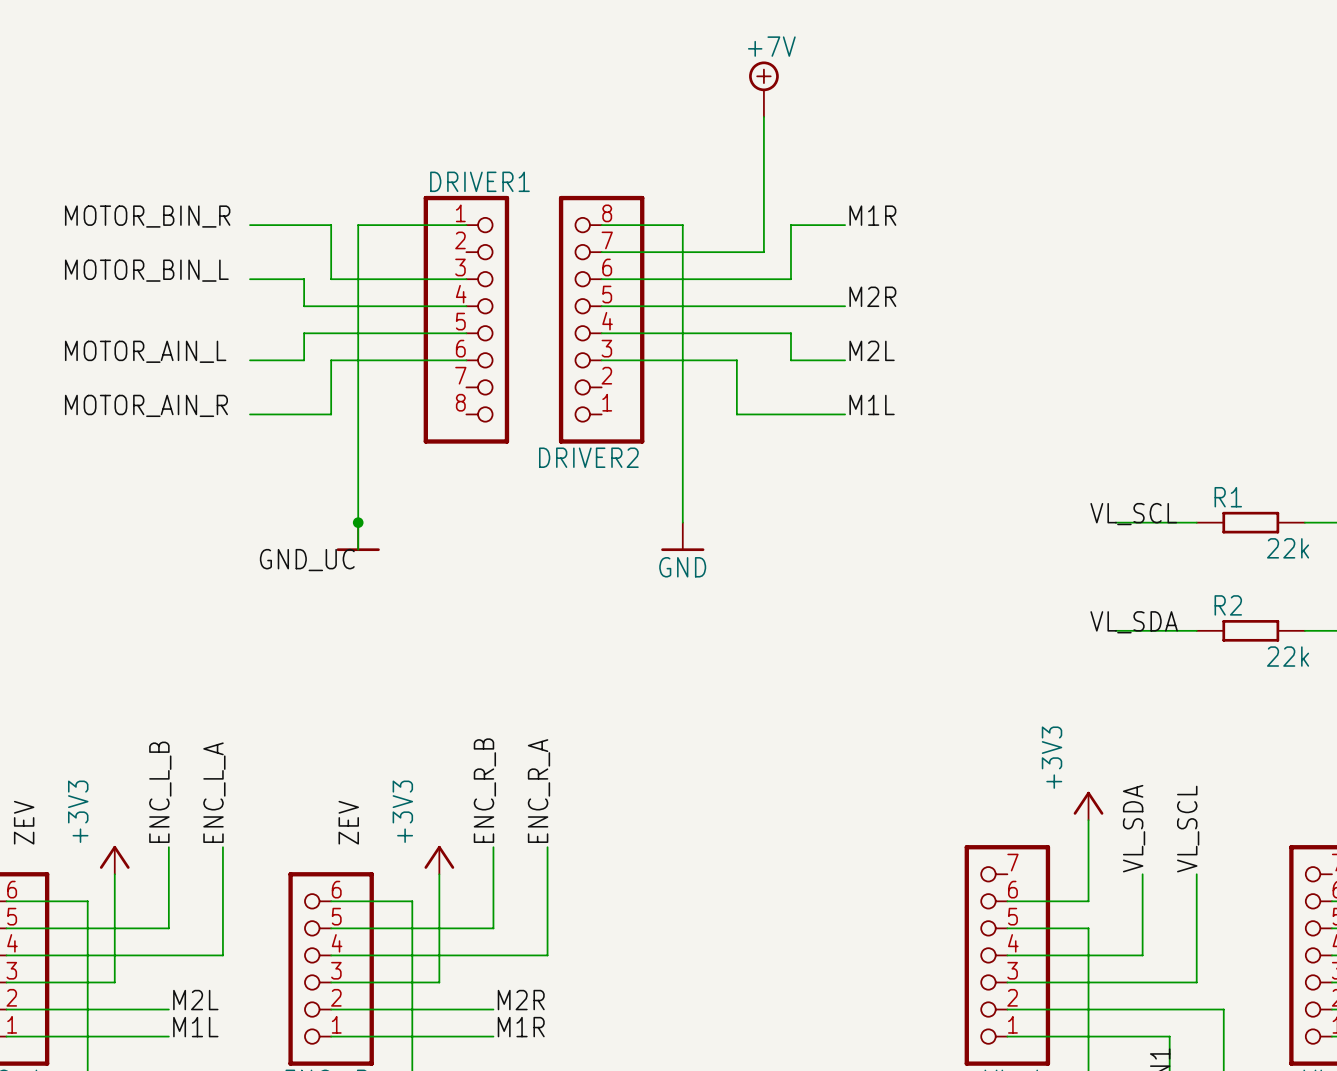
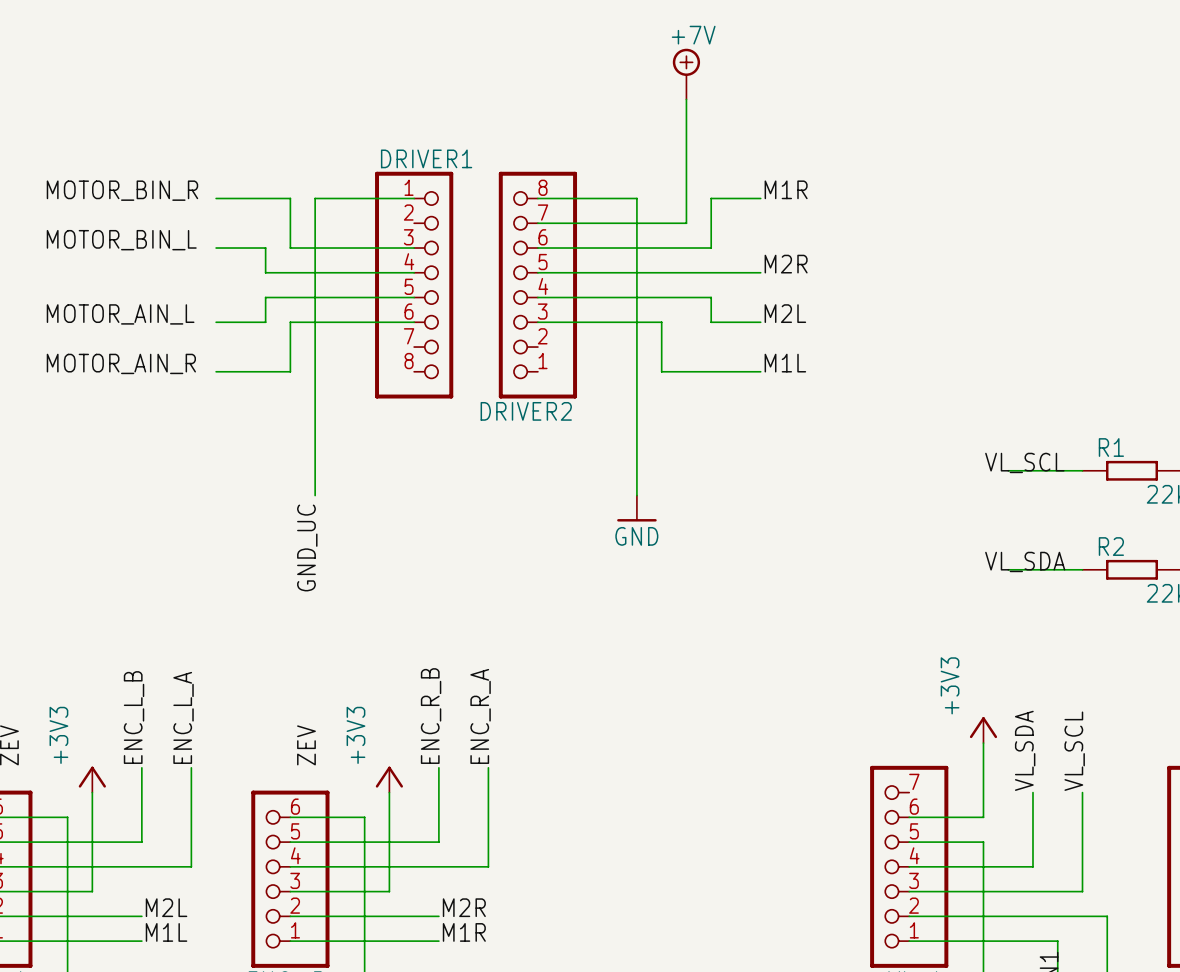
wire: (682, 225) (682, 522) -> (612, 198) (636, 198) (636, 495)
junction: (358, 522) -> none
power symbol: (358, 536) -> none
power symbol position: GND (682, 536) -> GND (636, 508)
label rotation: 0° (307, 560) -> 90° counterclockwise (307, 547)

